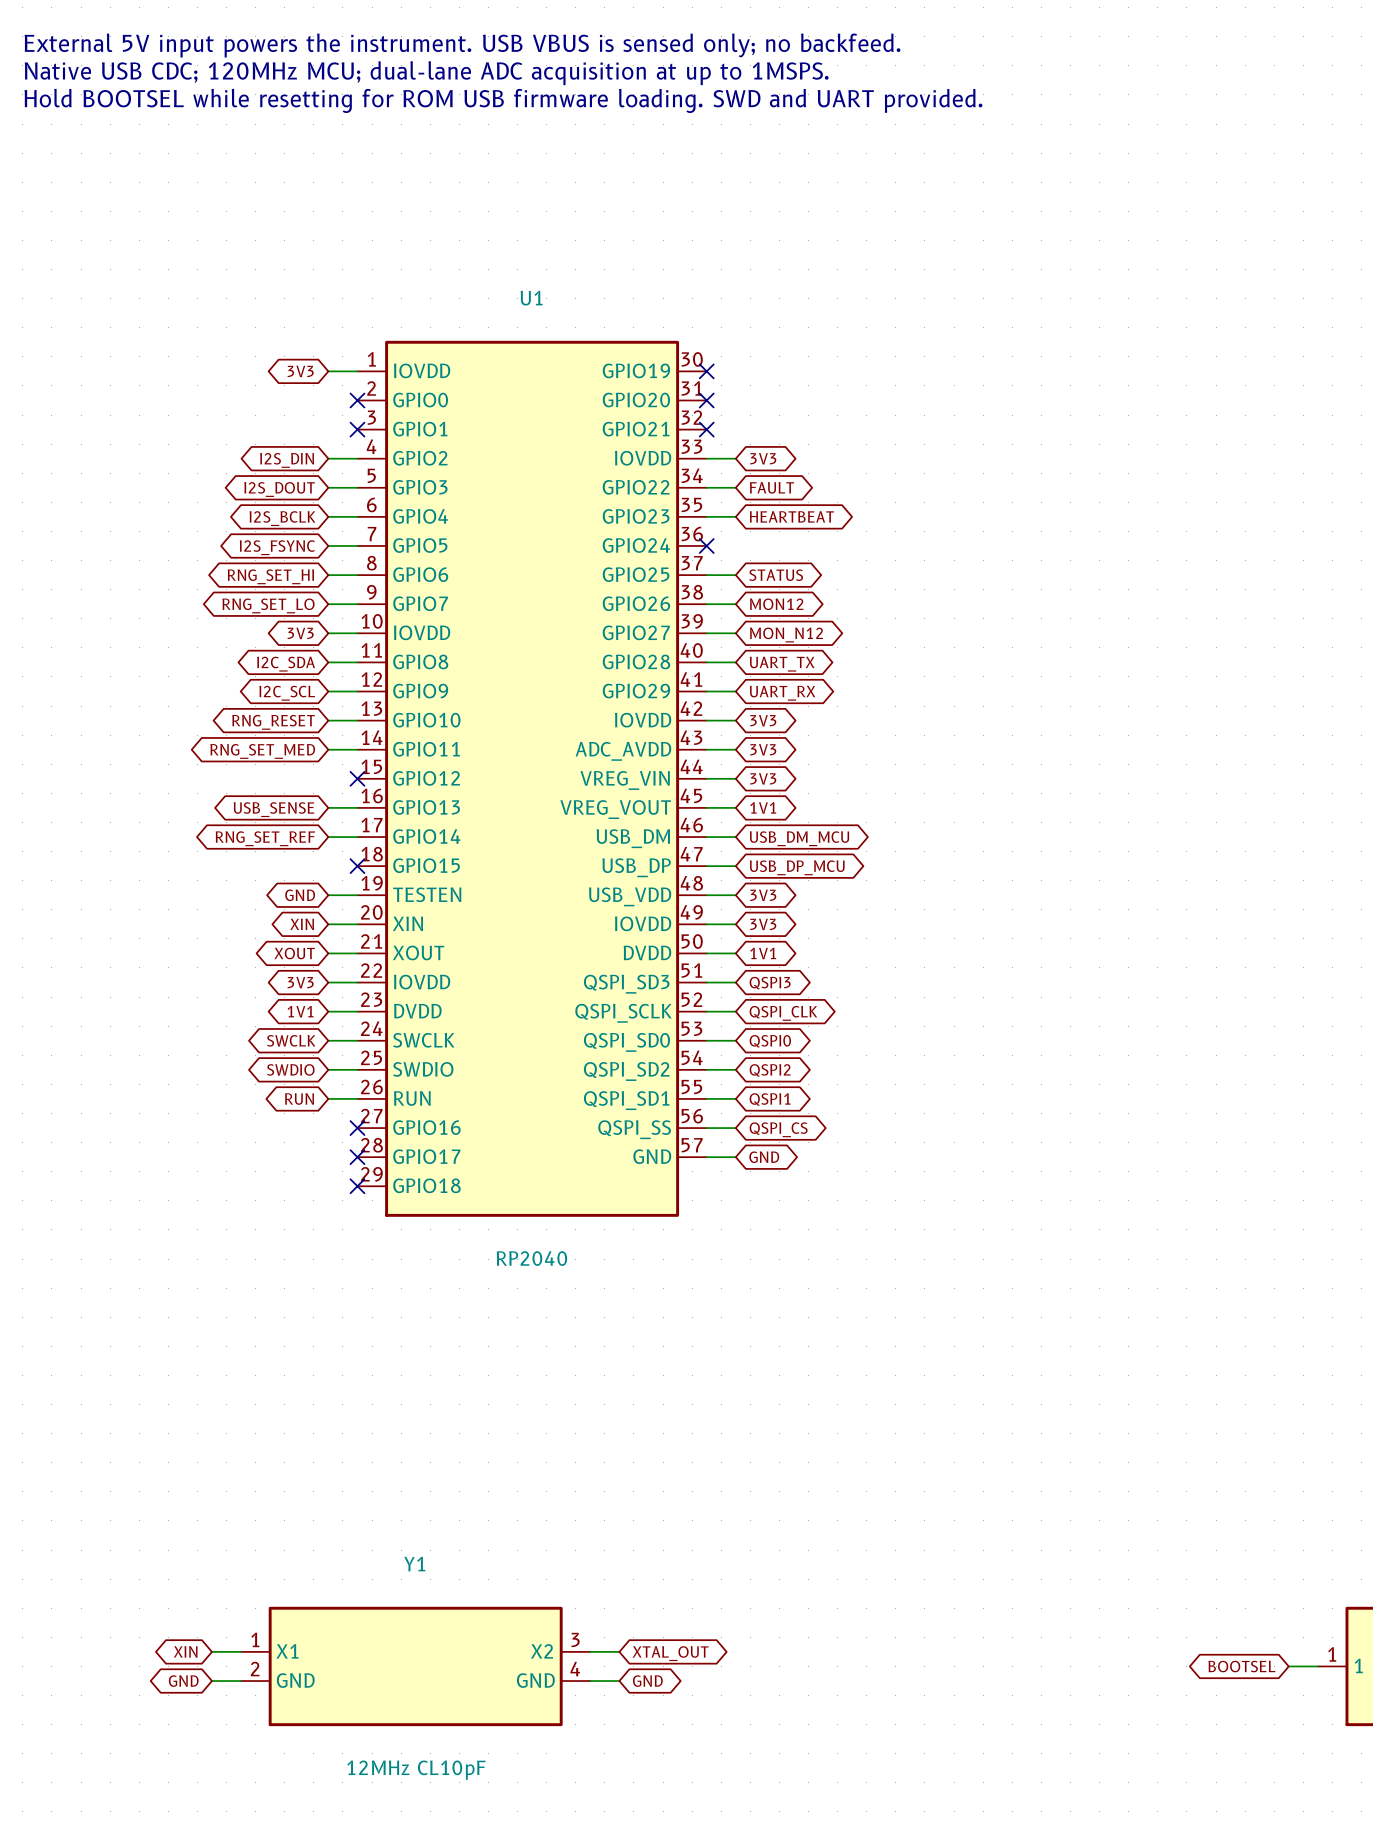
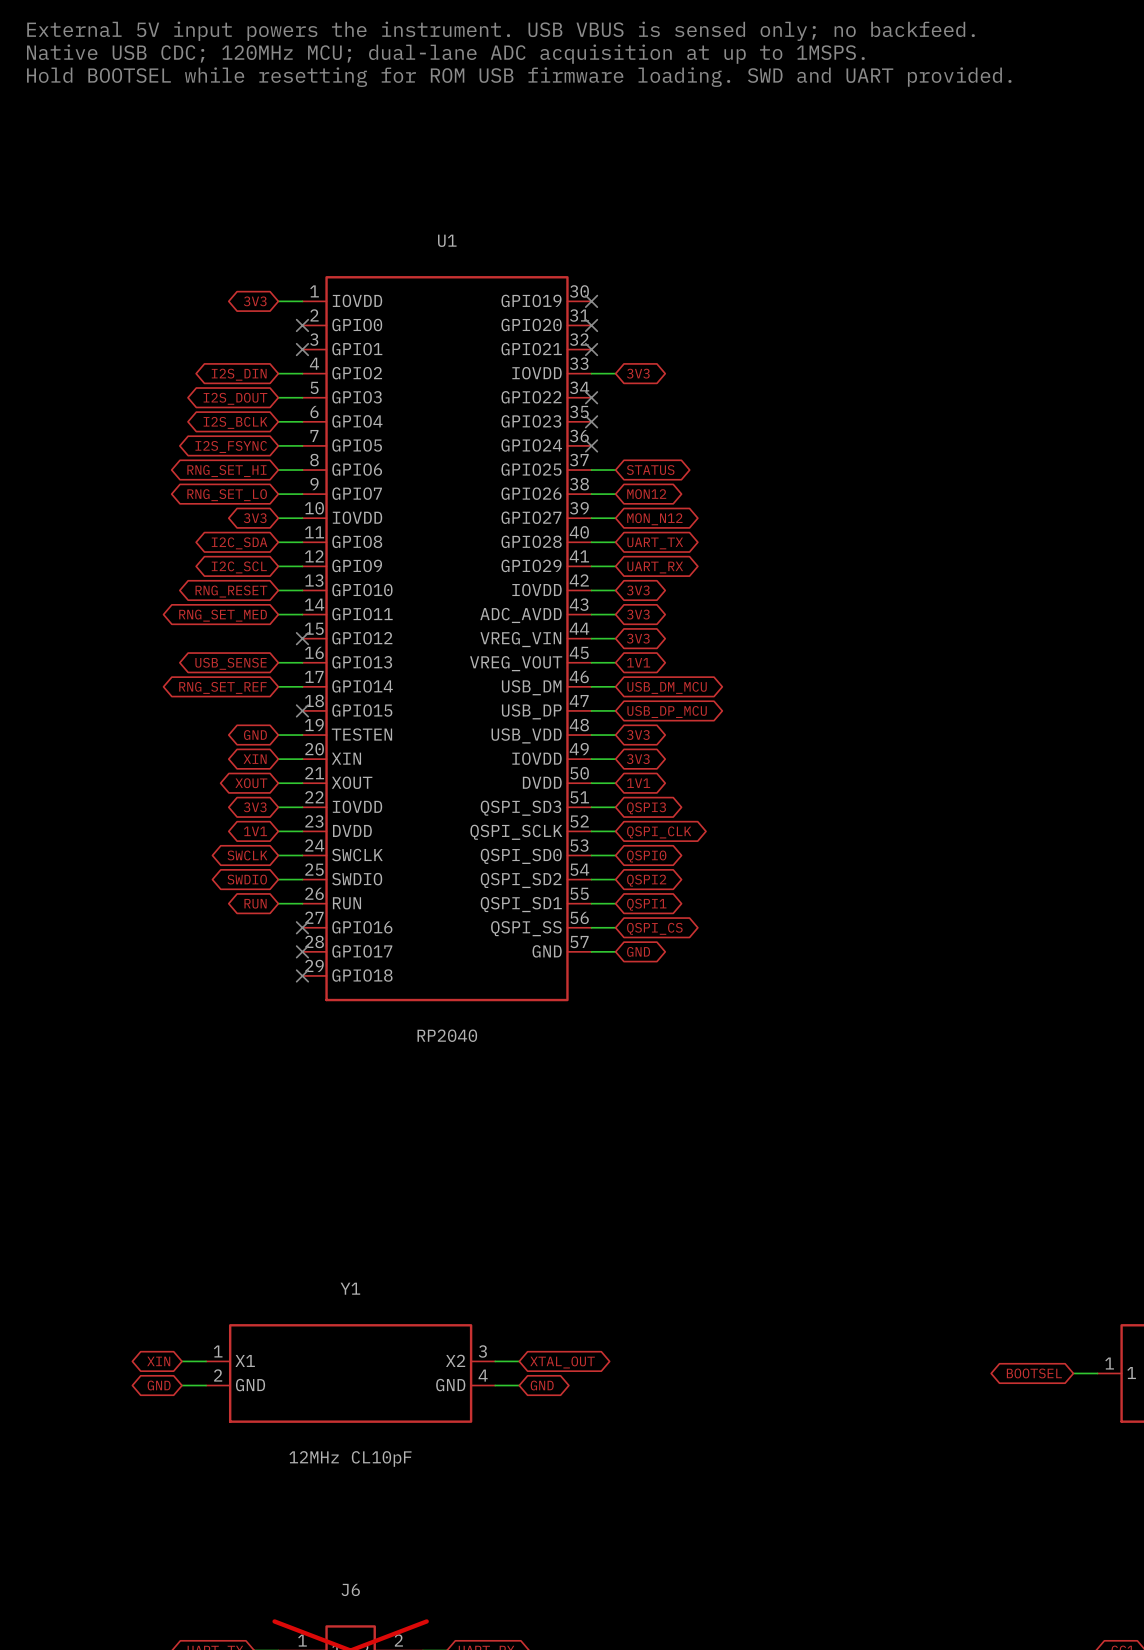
wire: (706, 487) (735, 487) -> none
no-connect mark: none -> (591, 397)
global label: FAULT (771, 487) -> none
wire: (706, 516) (735, 516) -> none
no-connect mark: none -> (591, 421)
global label: HEARTBEAT (791, 516) -> none

